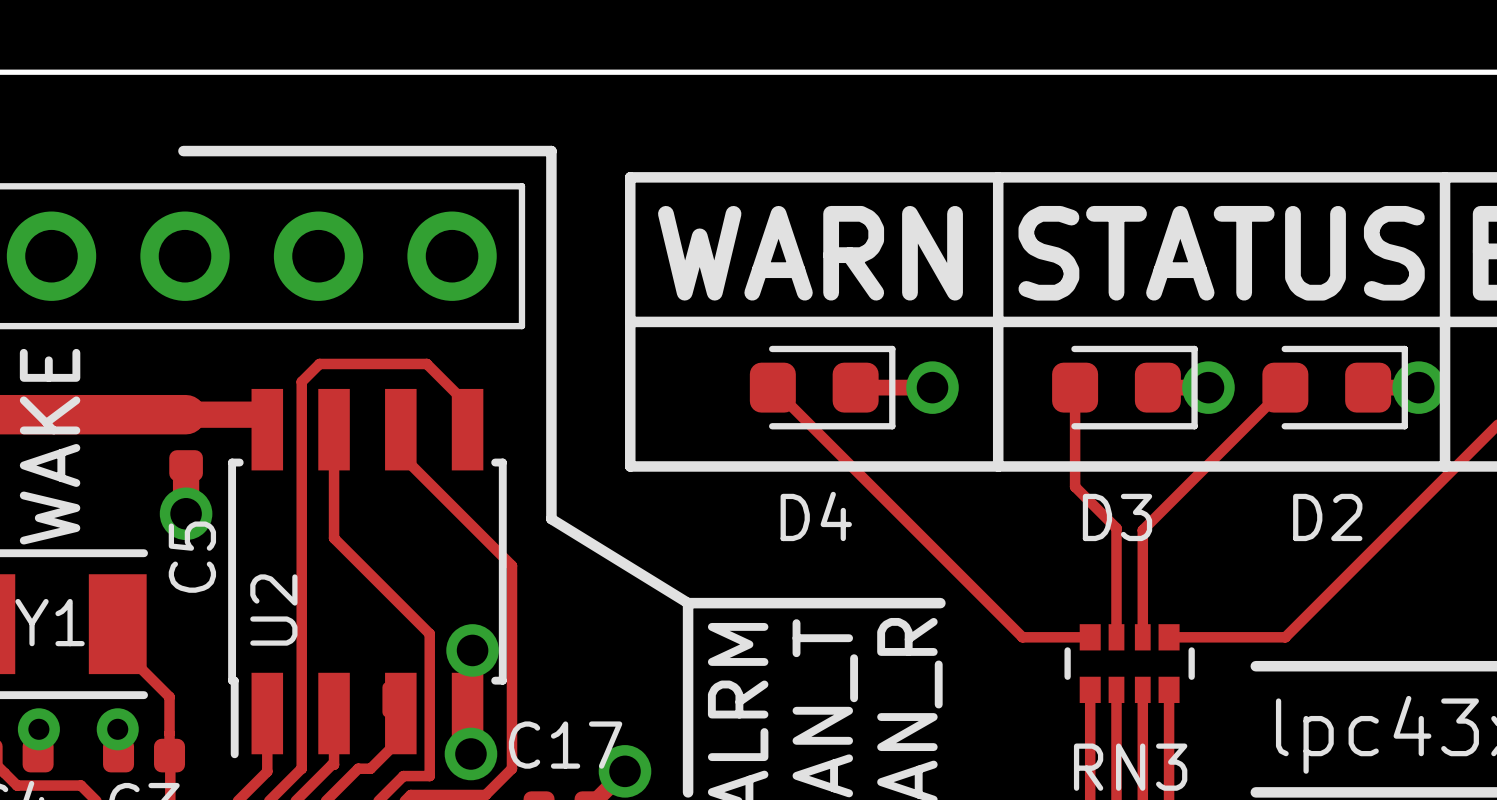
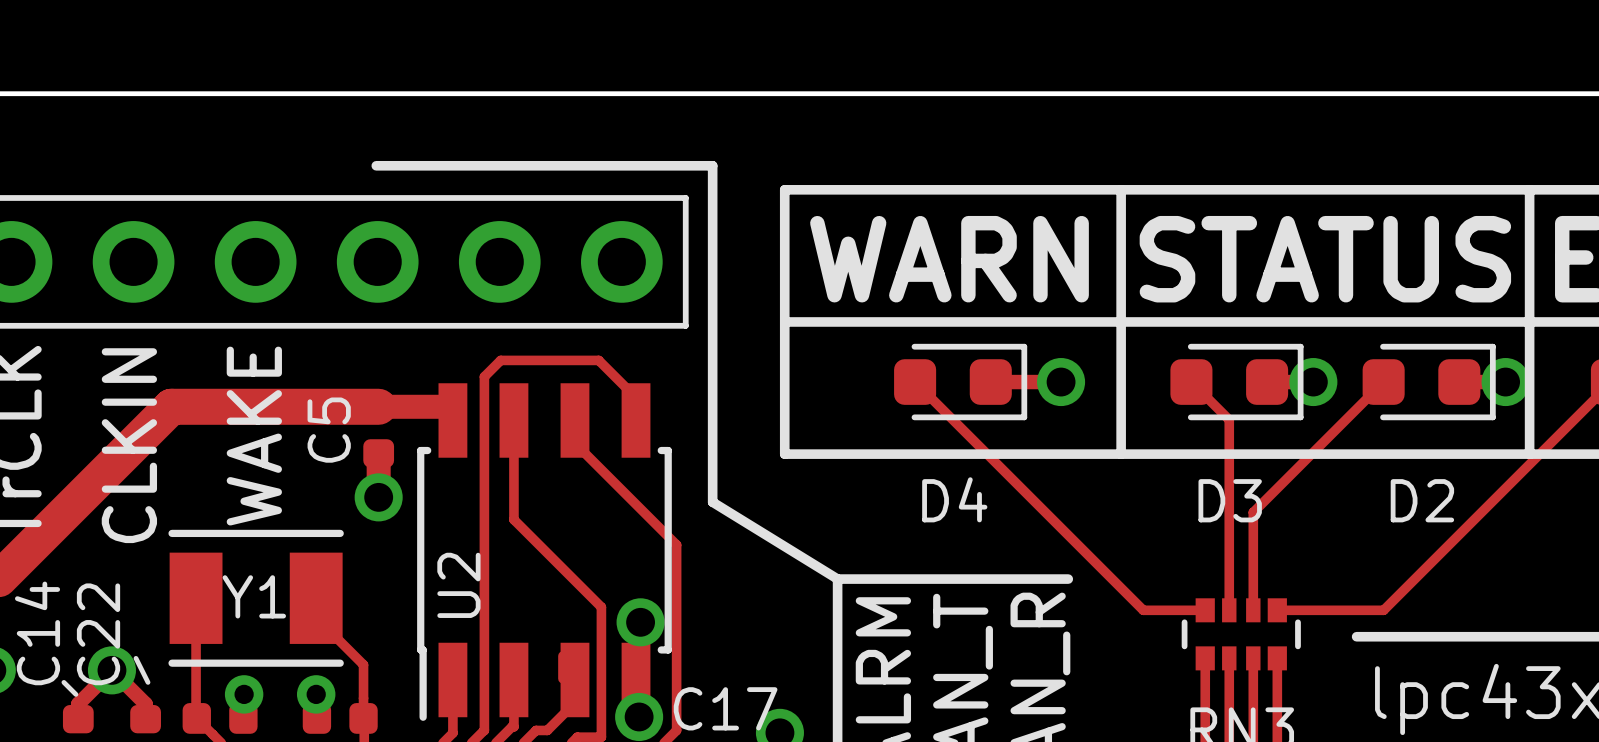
track: (1075, 387) (1075, 486) (1116, 528) -> (1191, 382) (1229, 419) (1229, 510)
C5 name position: C5 (192, 557) -> C5 (329, 430)

